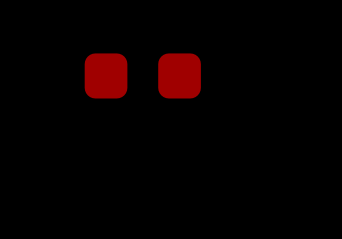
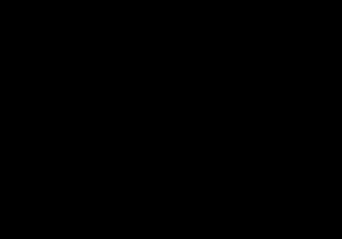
part: (142, 75) -> none

